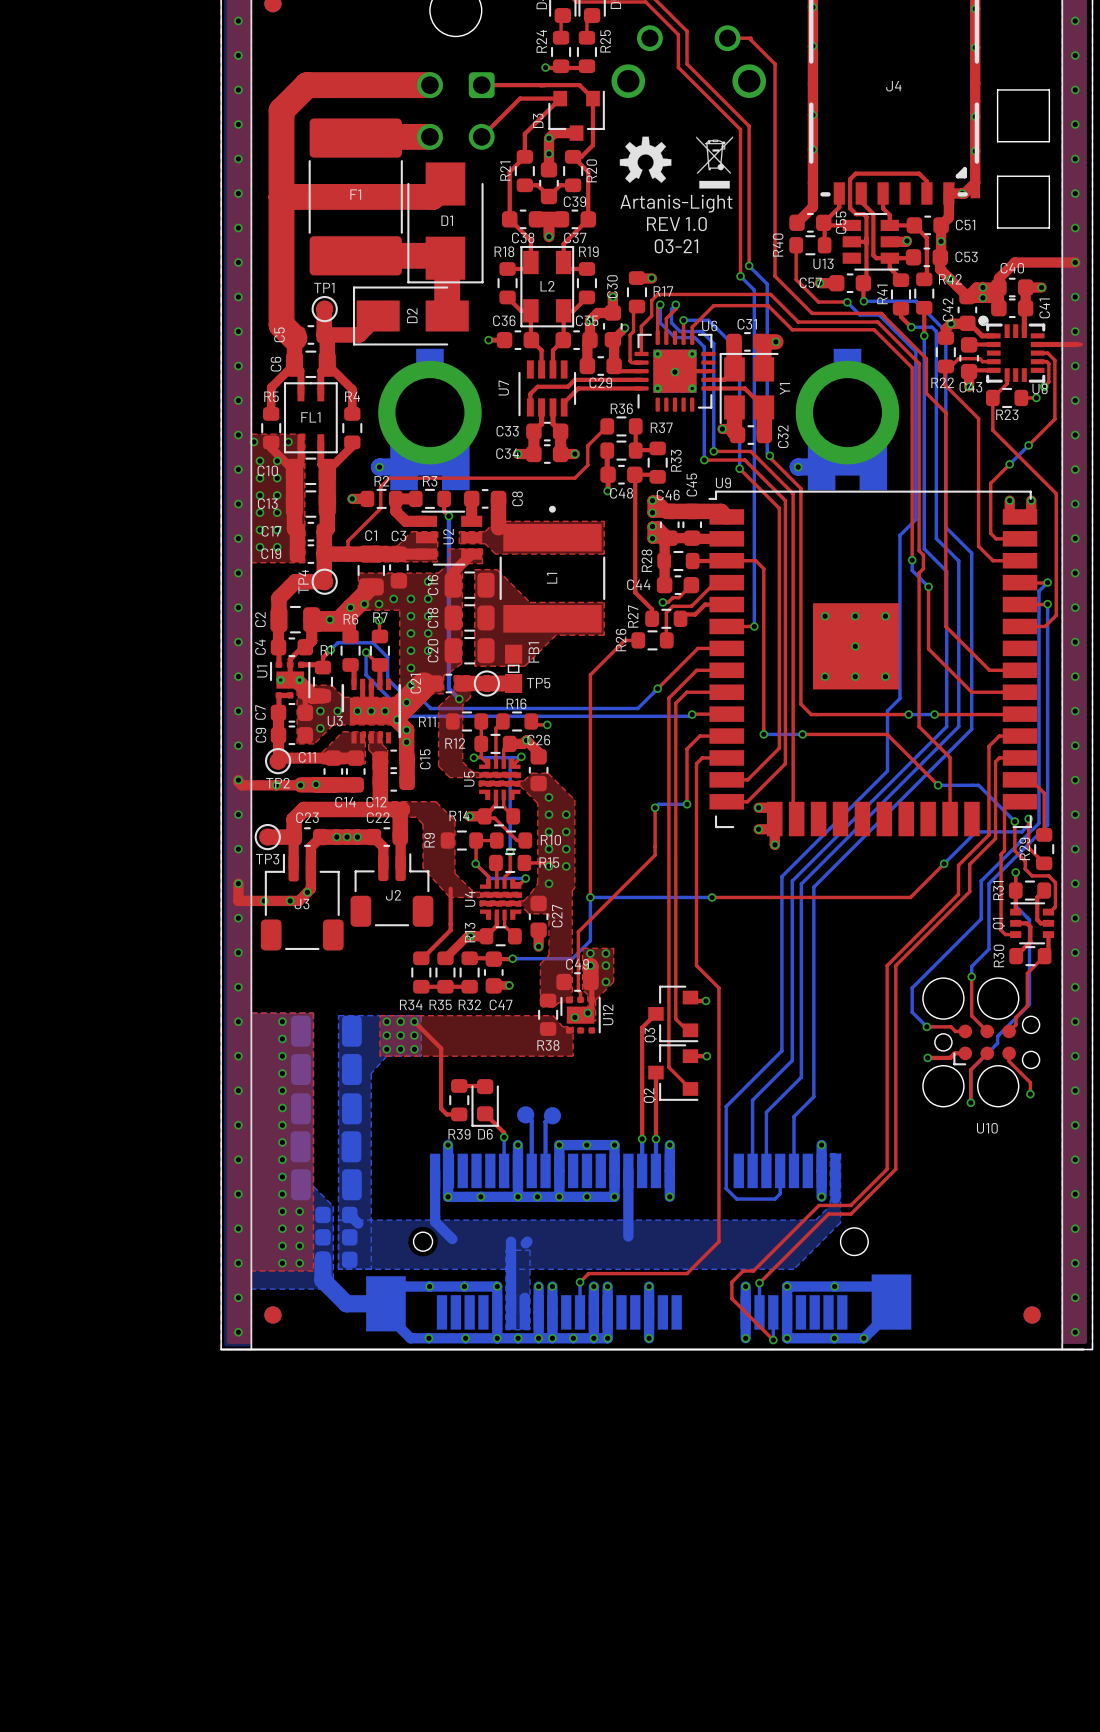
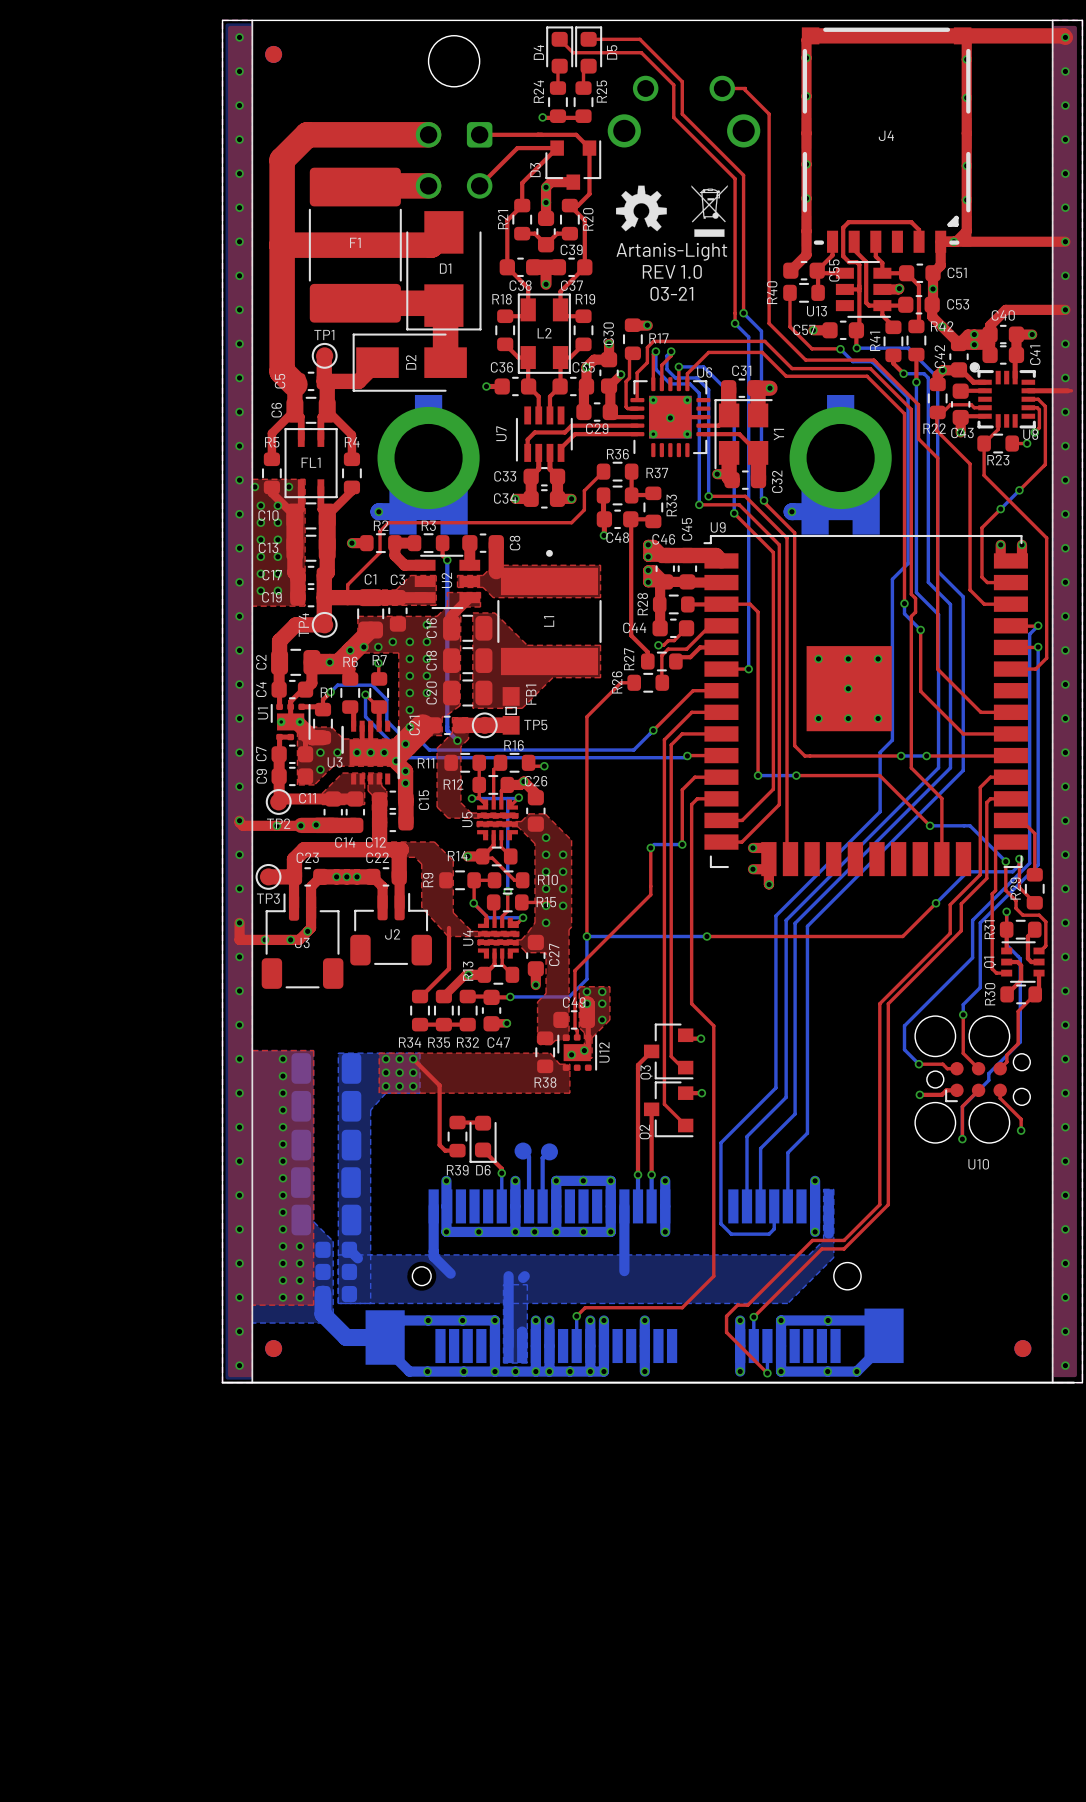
board edge: (997, 89) (997, 141) (1049, 141) (1049, 89) (997, 89) -> none
board edge: (997, 176) (997, 228) (1049, 228) (1049, 176) (997, 176) -> none
top track: none -> (956, 241) (1065, 241)

